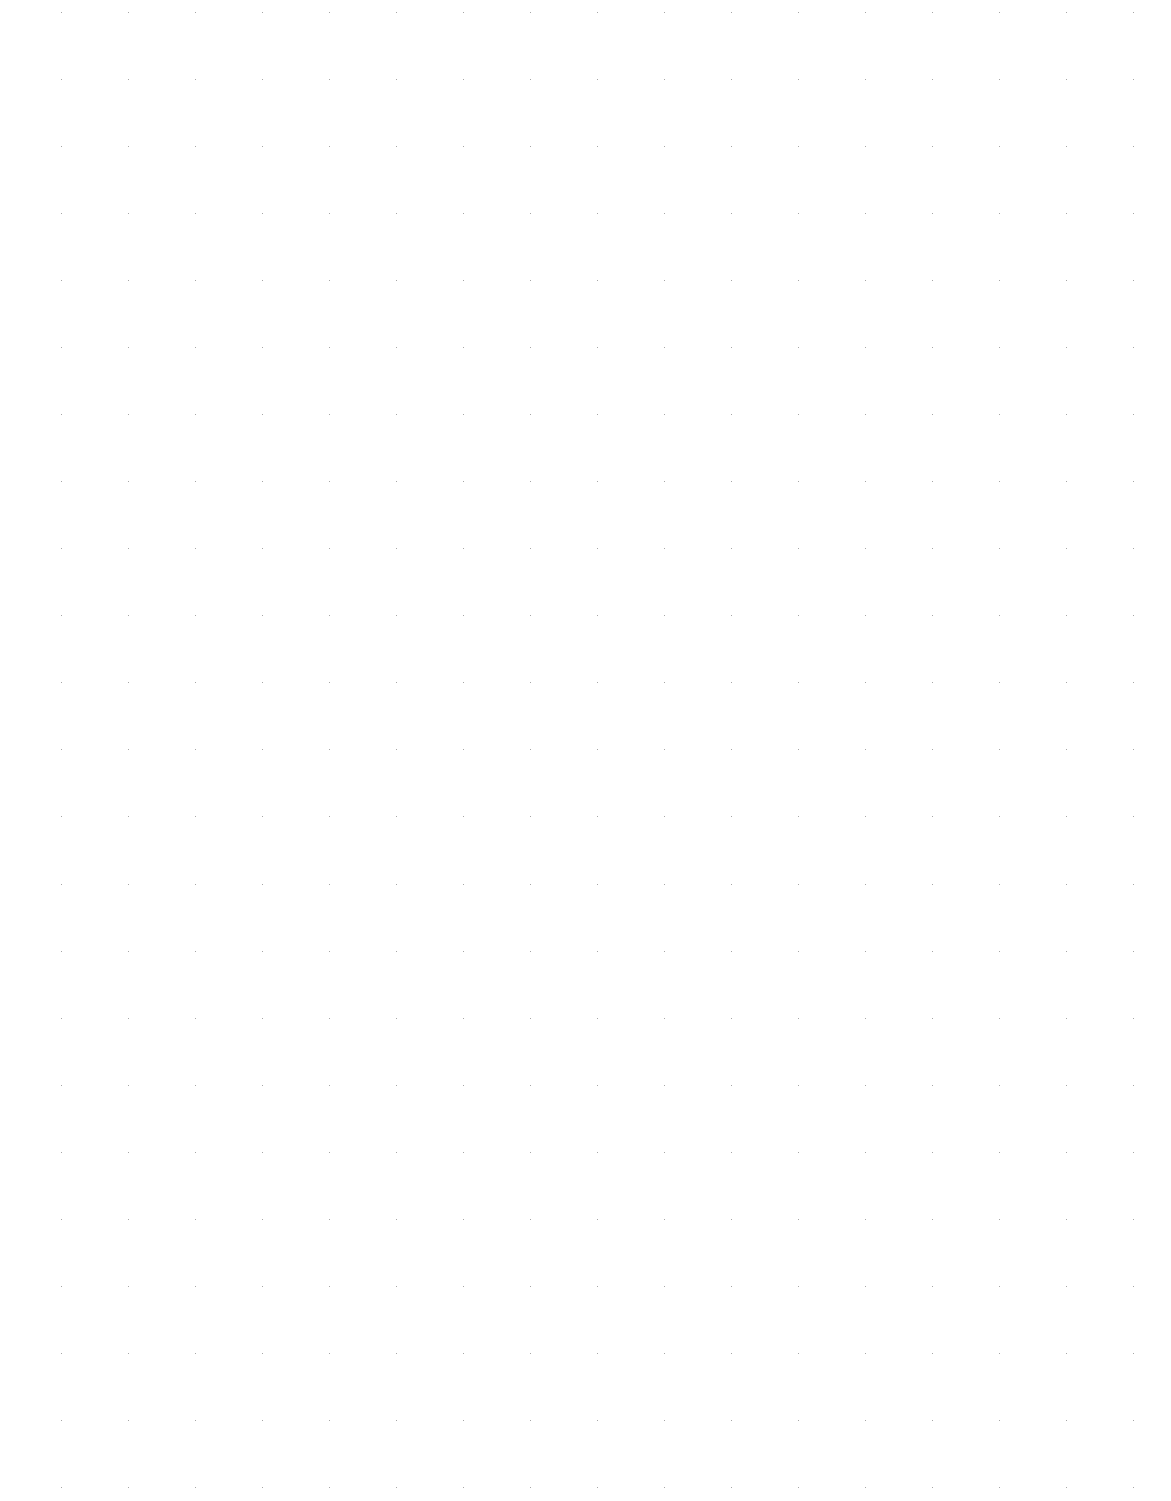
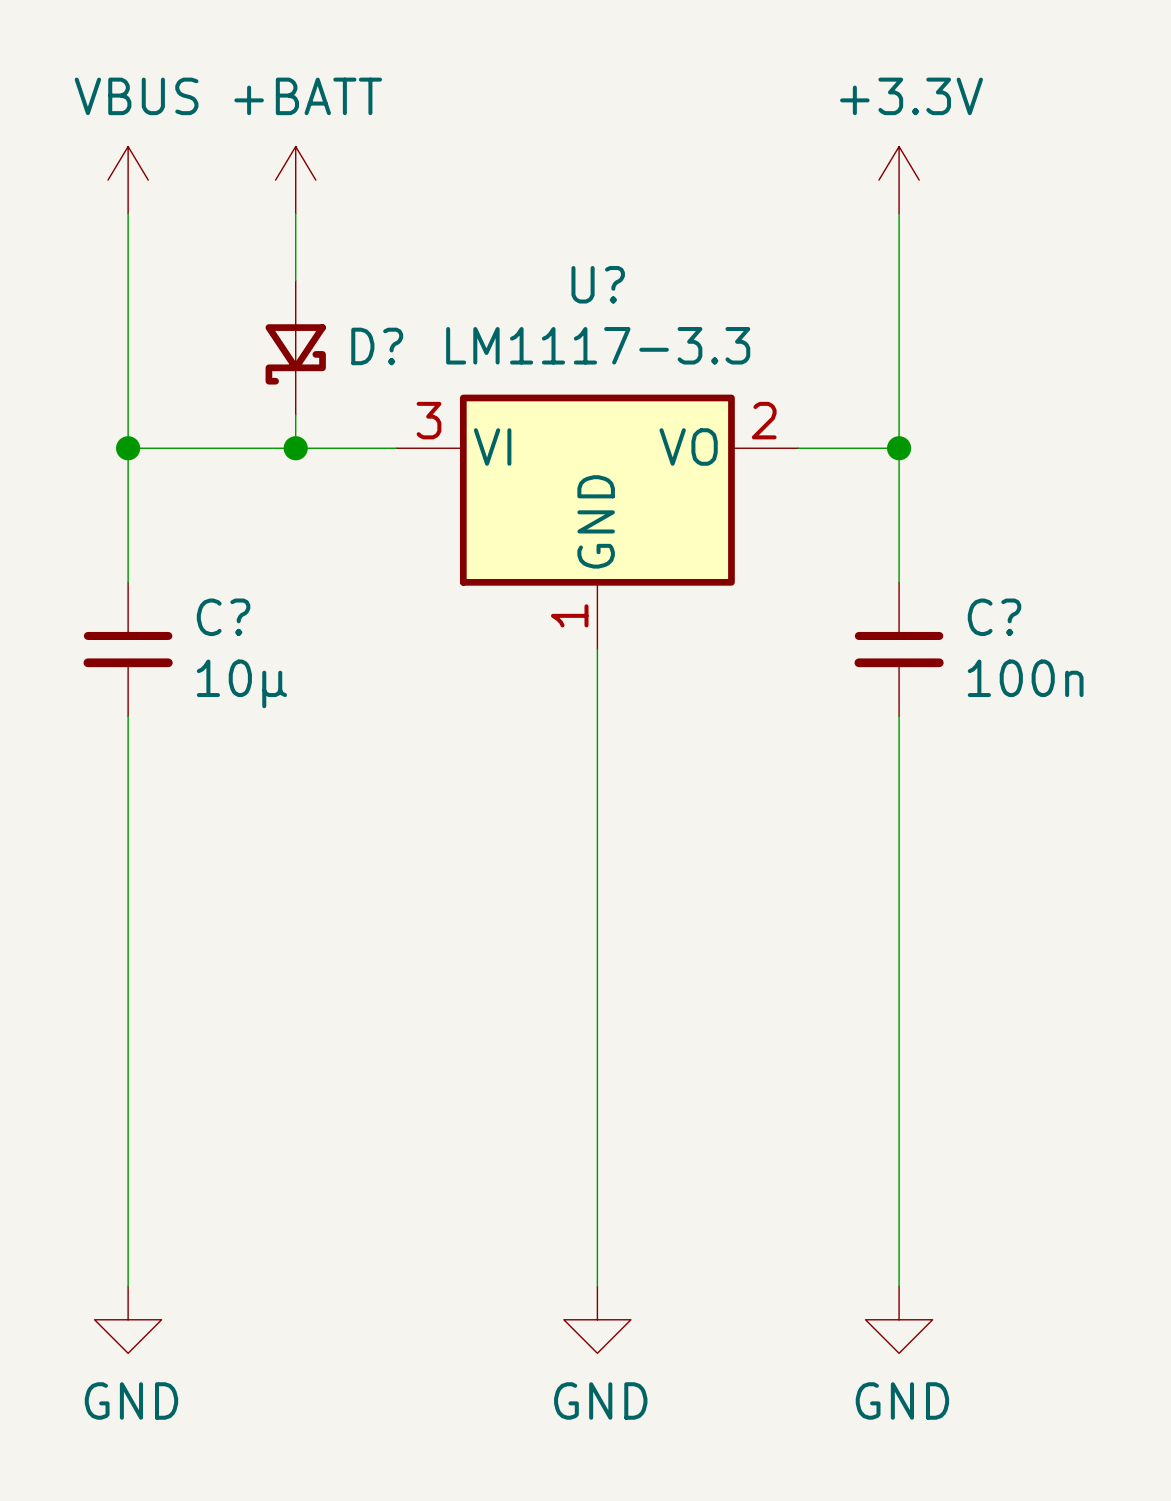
power symbol: none -> VBUS (128, 180)
power symbol: none -> +BATT (295, 180)
power symbol: none -> +3.3V (899, 180)
wire: none -> (128, 213) (128, 582)
wire: none -> (295, 213) (295, 280)
wire: none -> (899, 213) (899, 582)
D?: none -> (295, 347)
wire: none -> (295, 414) (295, 448)
wire: none -> (128, 448) (396, 448)
junction: none -> (128, 448)
junction: none -> (295, 448)
wire: none -> (798, 448) (899, 448)
junction: none -> (899, 448)
U?: none -> LM1117-3.3 (597, 522)
C?: none -> 10µ (128, 649)
wire: none -> (597, 649) (597, 1286)
C?: none -> 100n (899, 649)
wire: none -> (128, 716) (128, 1286)
wire: none -> (899, 716) (899, 1286)
power symbol: none -> GND (128, 1319)
power symbol: none -> GND (597, 1319)
power symbol: none -> GND (899, 1319)

